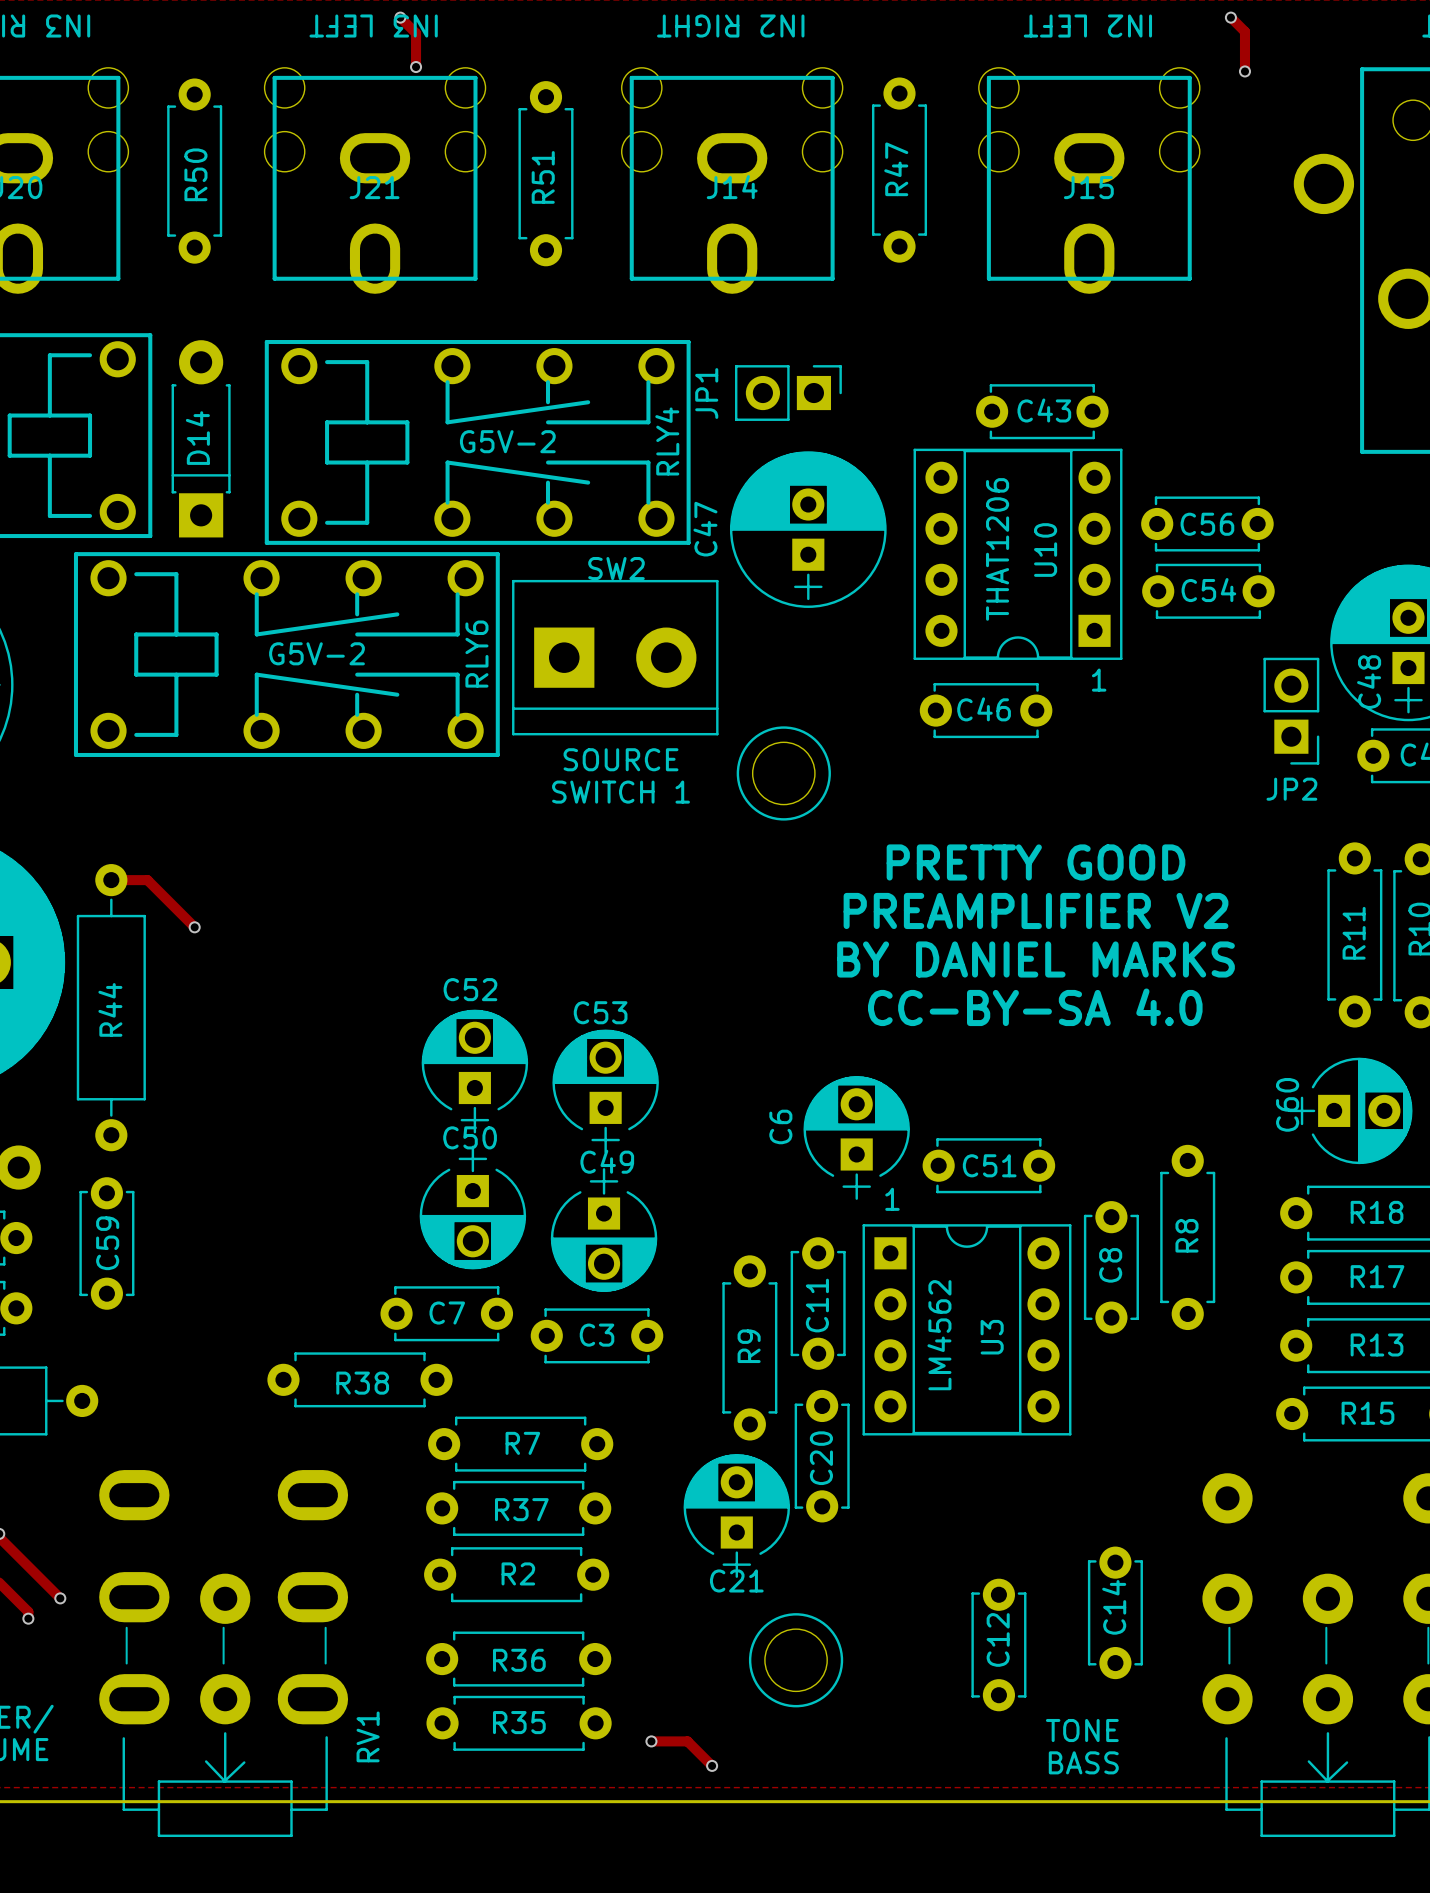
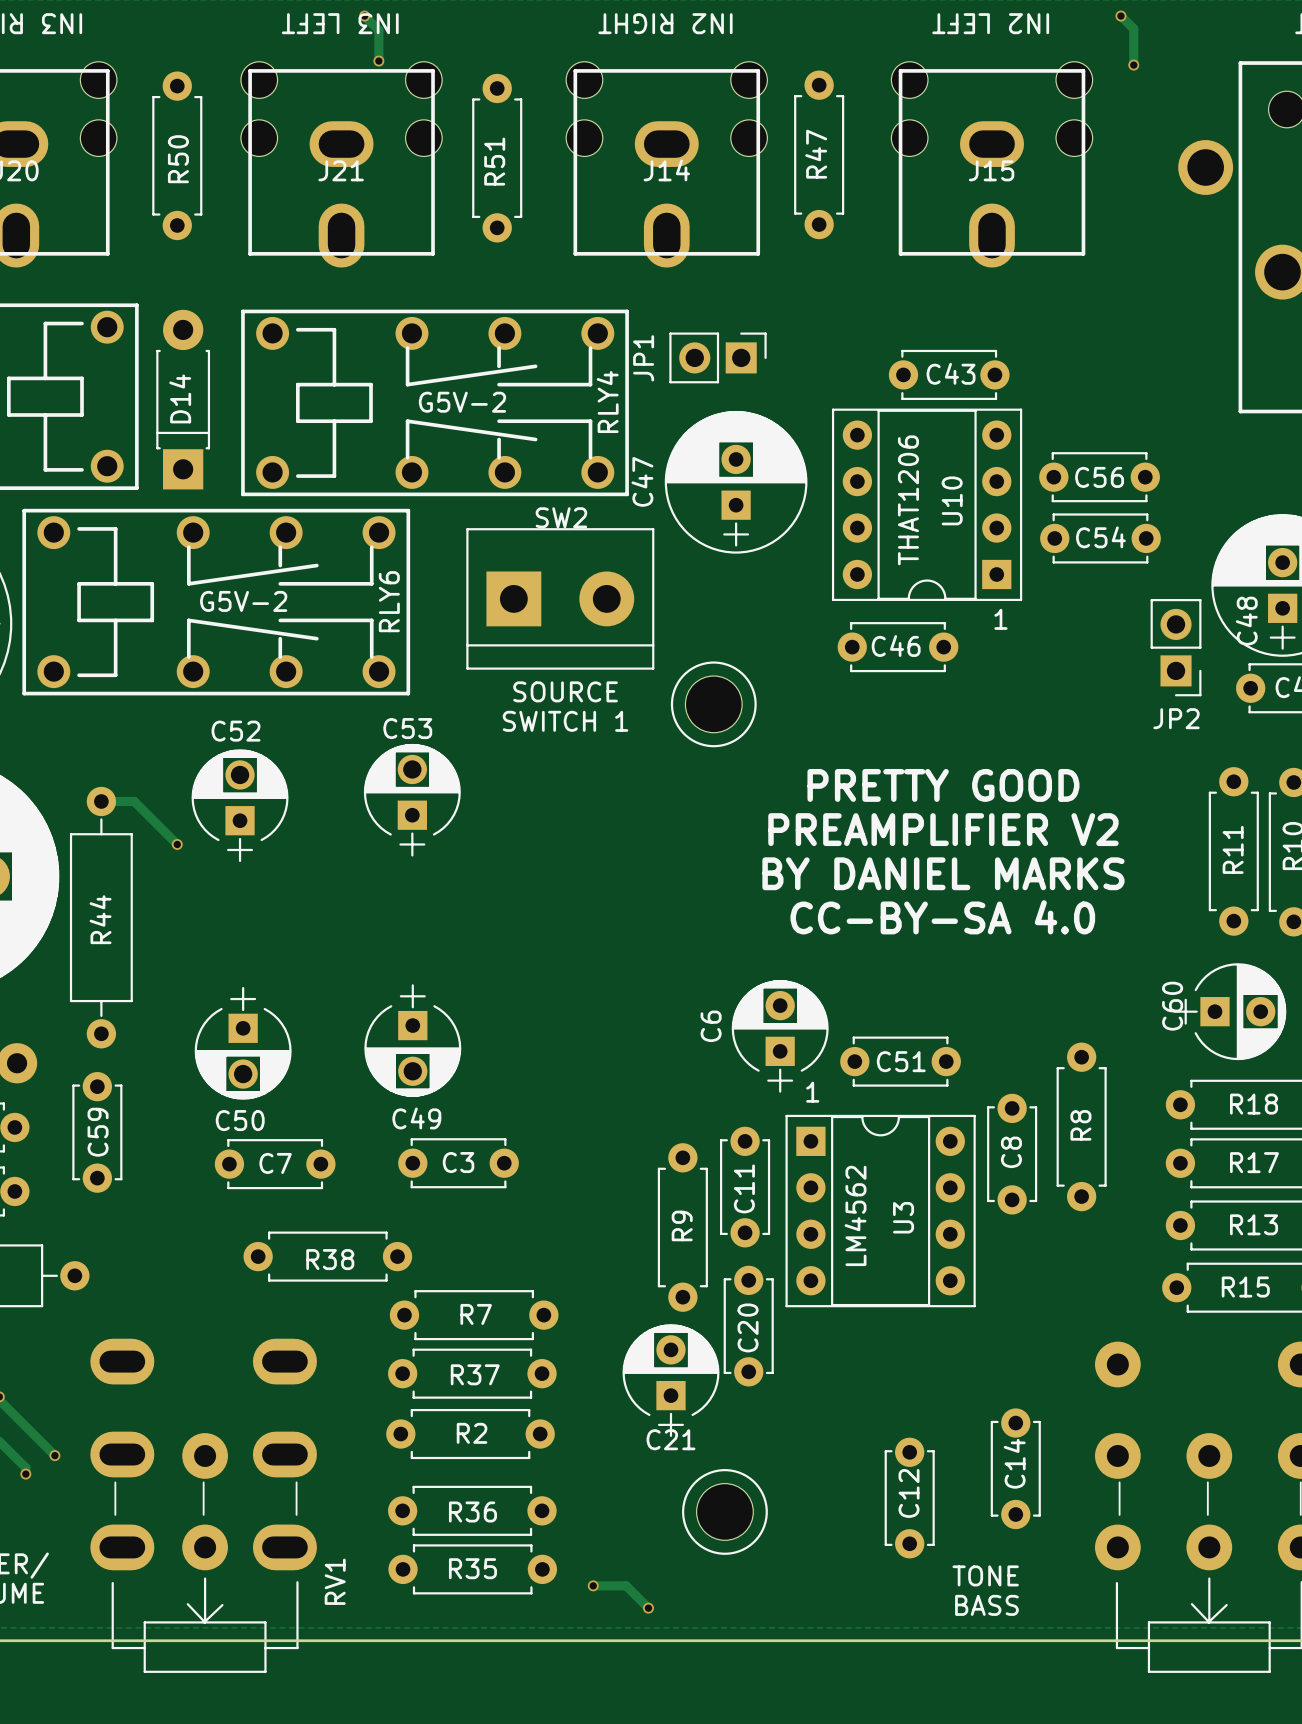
RLY6 position: (286, 654) -> (216, 602)
C52 position: (474, 1071) -> (240, 805)
C53 position: (605, 1091) -> (412, 800)
C50 name position: C50 (470, 1137) -> C50 (240, 1120)
C49 name position: C49 (607, 1161) -> C49 (416, 1118)
C50 position: (472, 1207) -> (243, 1043)
C49 position: (604, 1230) -> (412, 1040)
C7 position: (446, 1313) -> (275, 1164)
C3 position: (597, 1335) -> (458, 1163)

